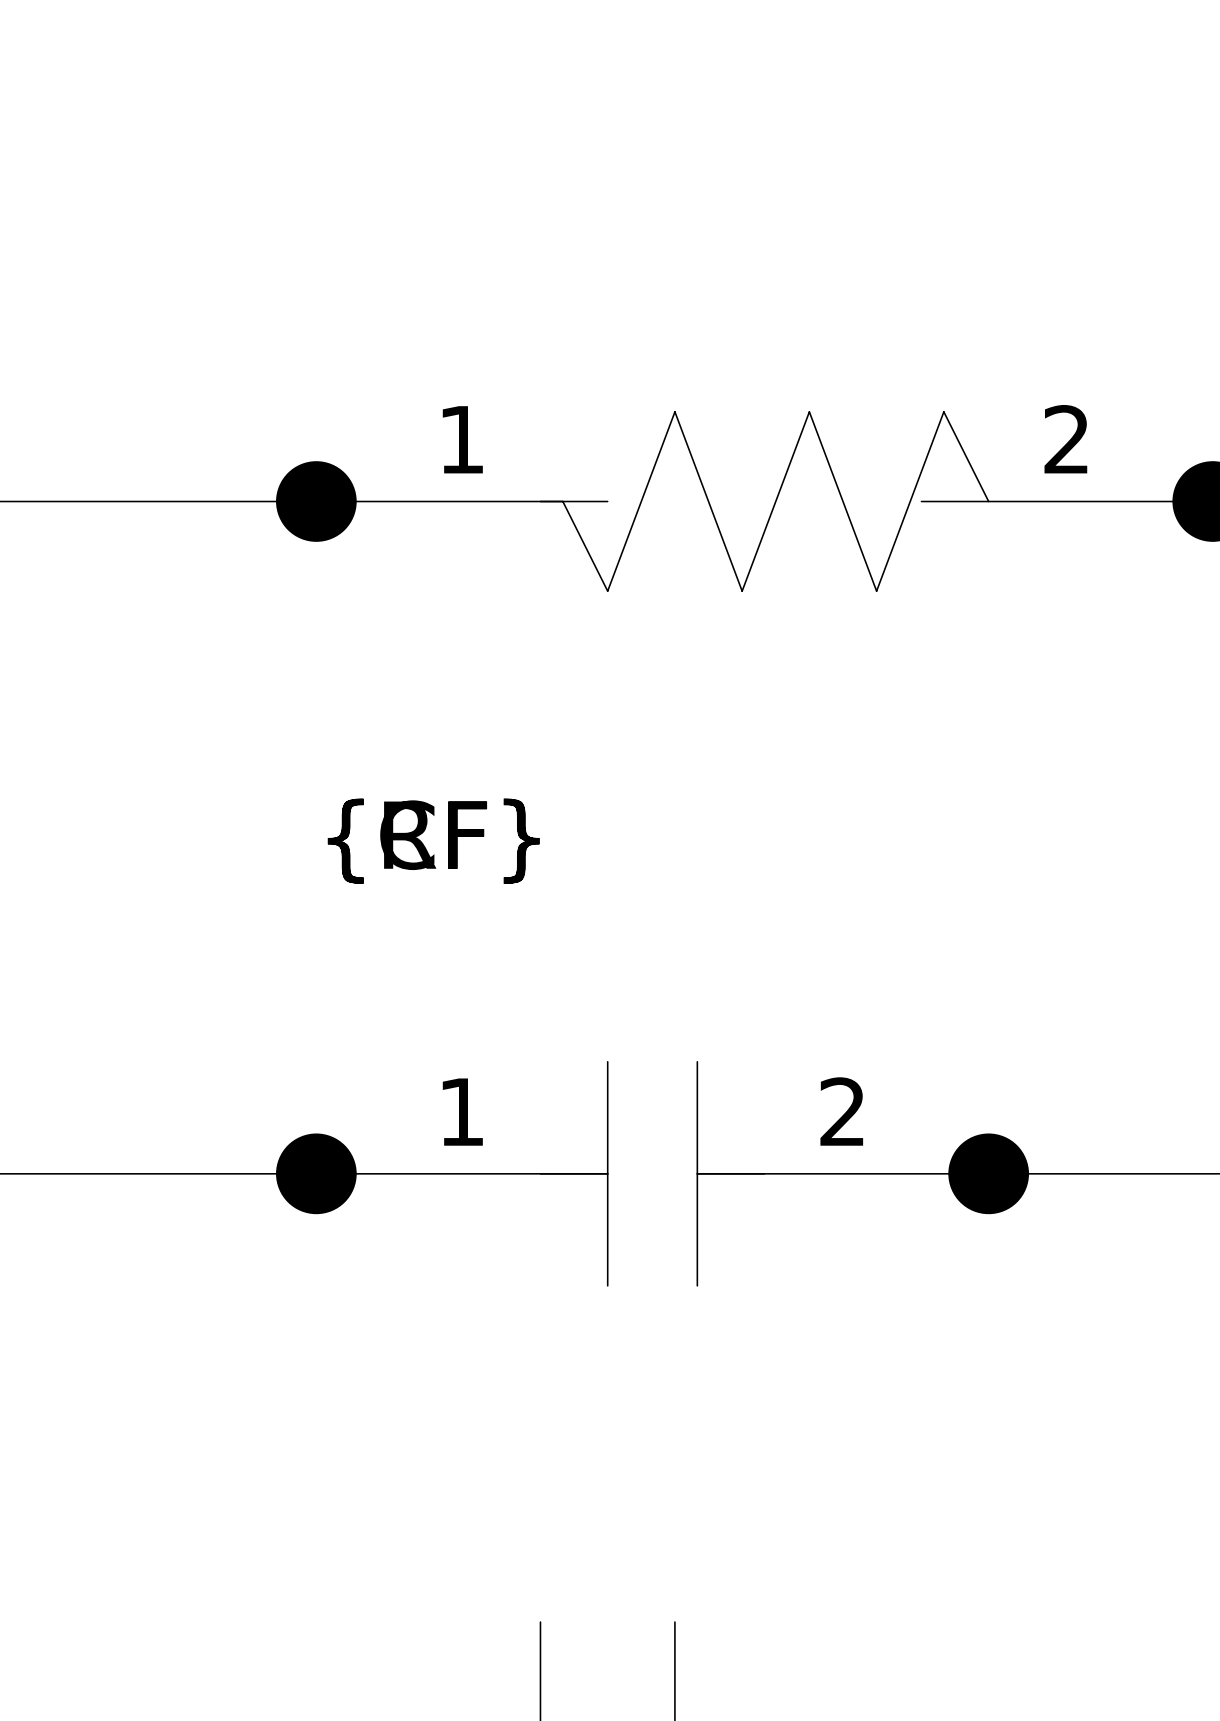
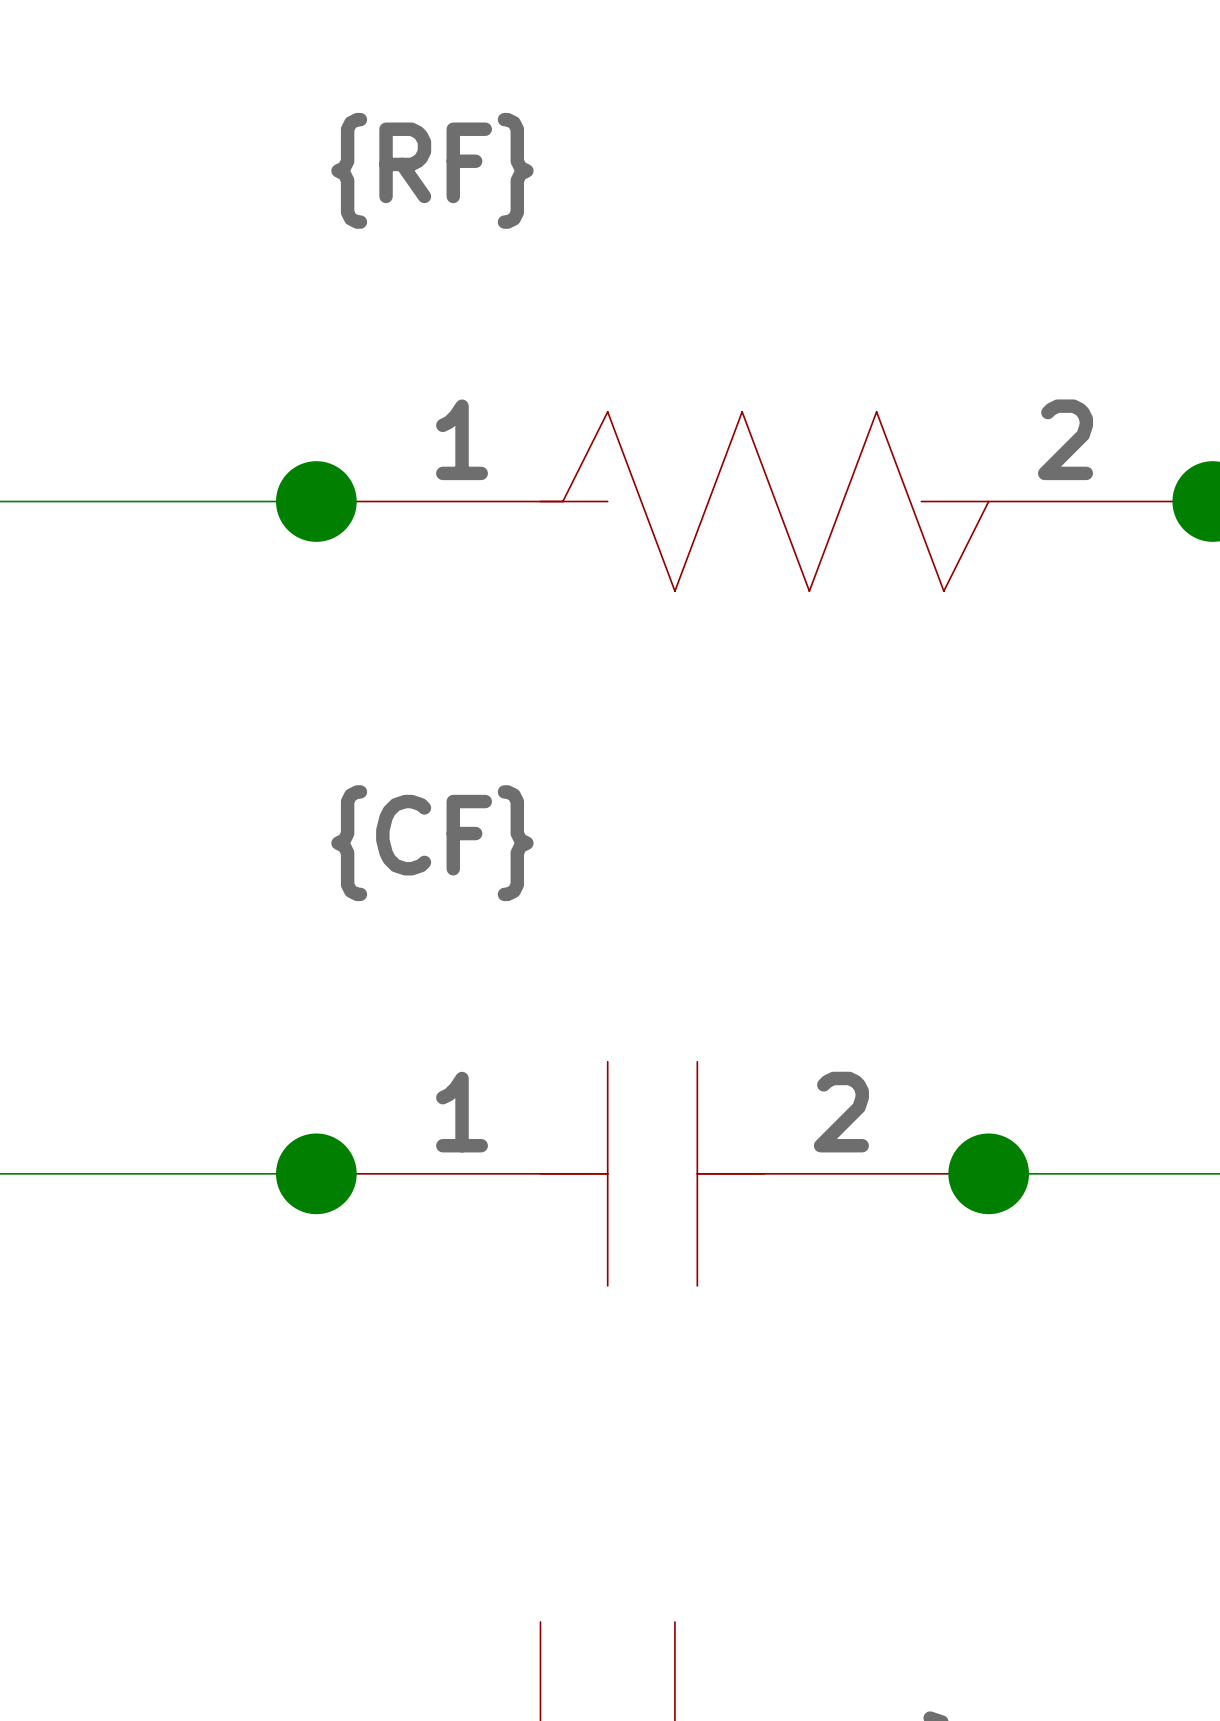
part flip: as is (764, 501) -> up-down (764, 501)

